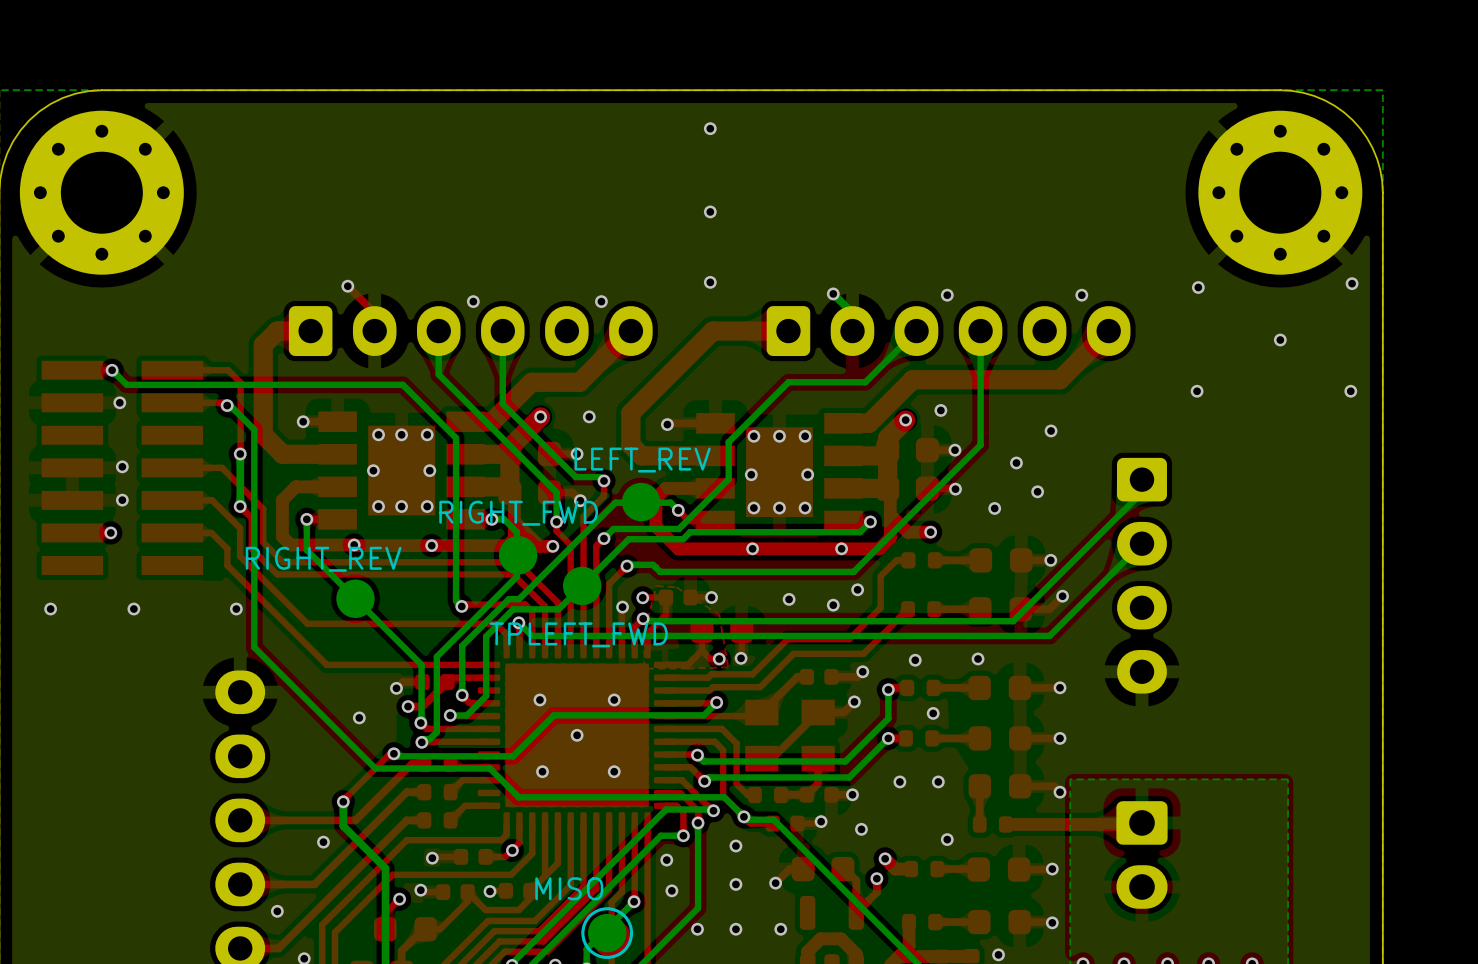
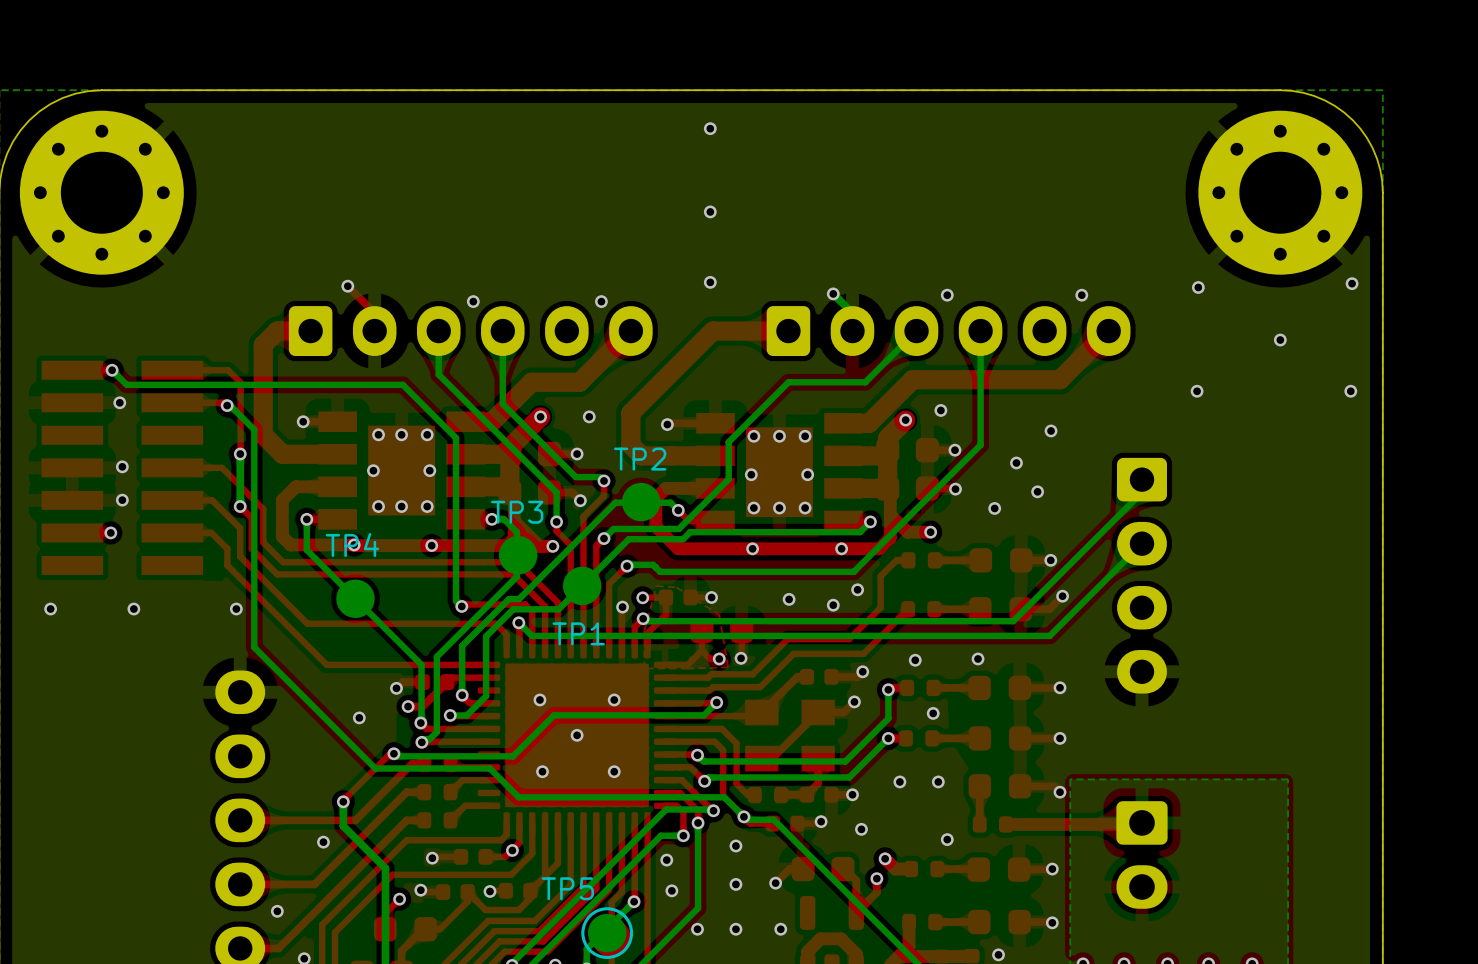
LEFT_REV name: LEFT_REV (642, 460) -> TP2 (640, 459)
RIGHT_FWD name: RIGHT_FWD (518, 513) -> TP3 (517, 512)
RIGHT_REV name: RIGHT_REV (323, 559) -> TP4 (352, 545)
TPLEFT_FWD name: TPLEFT_FWD (578, 634) -> TP1 (578, 633)
MISO name: MISO (569, 888) -> TP5 (567, 888)

